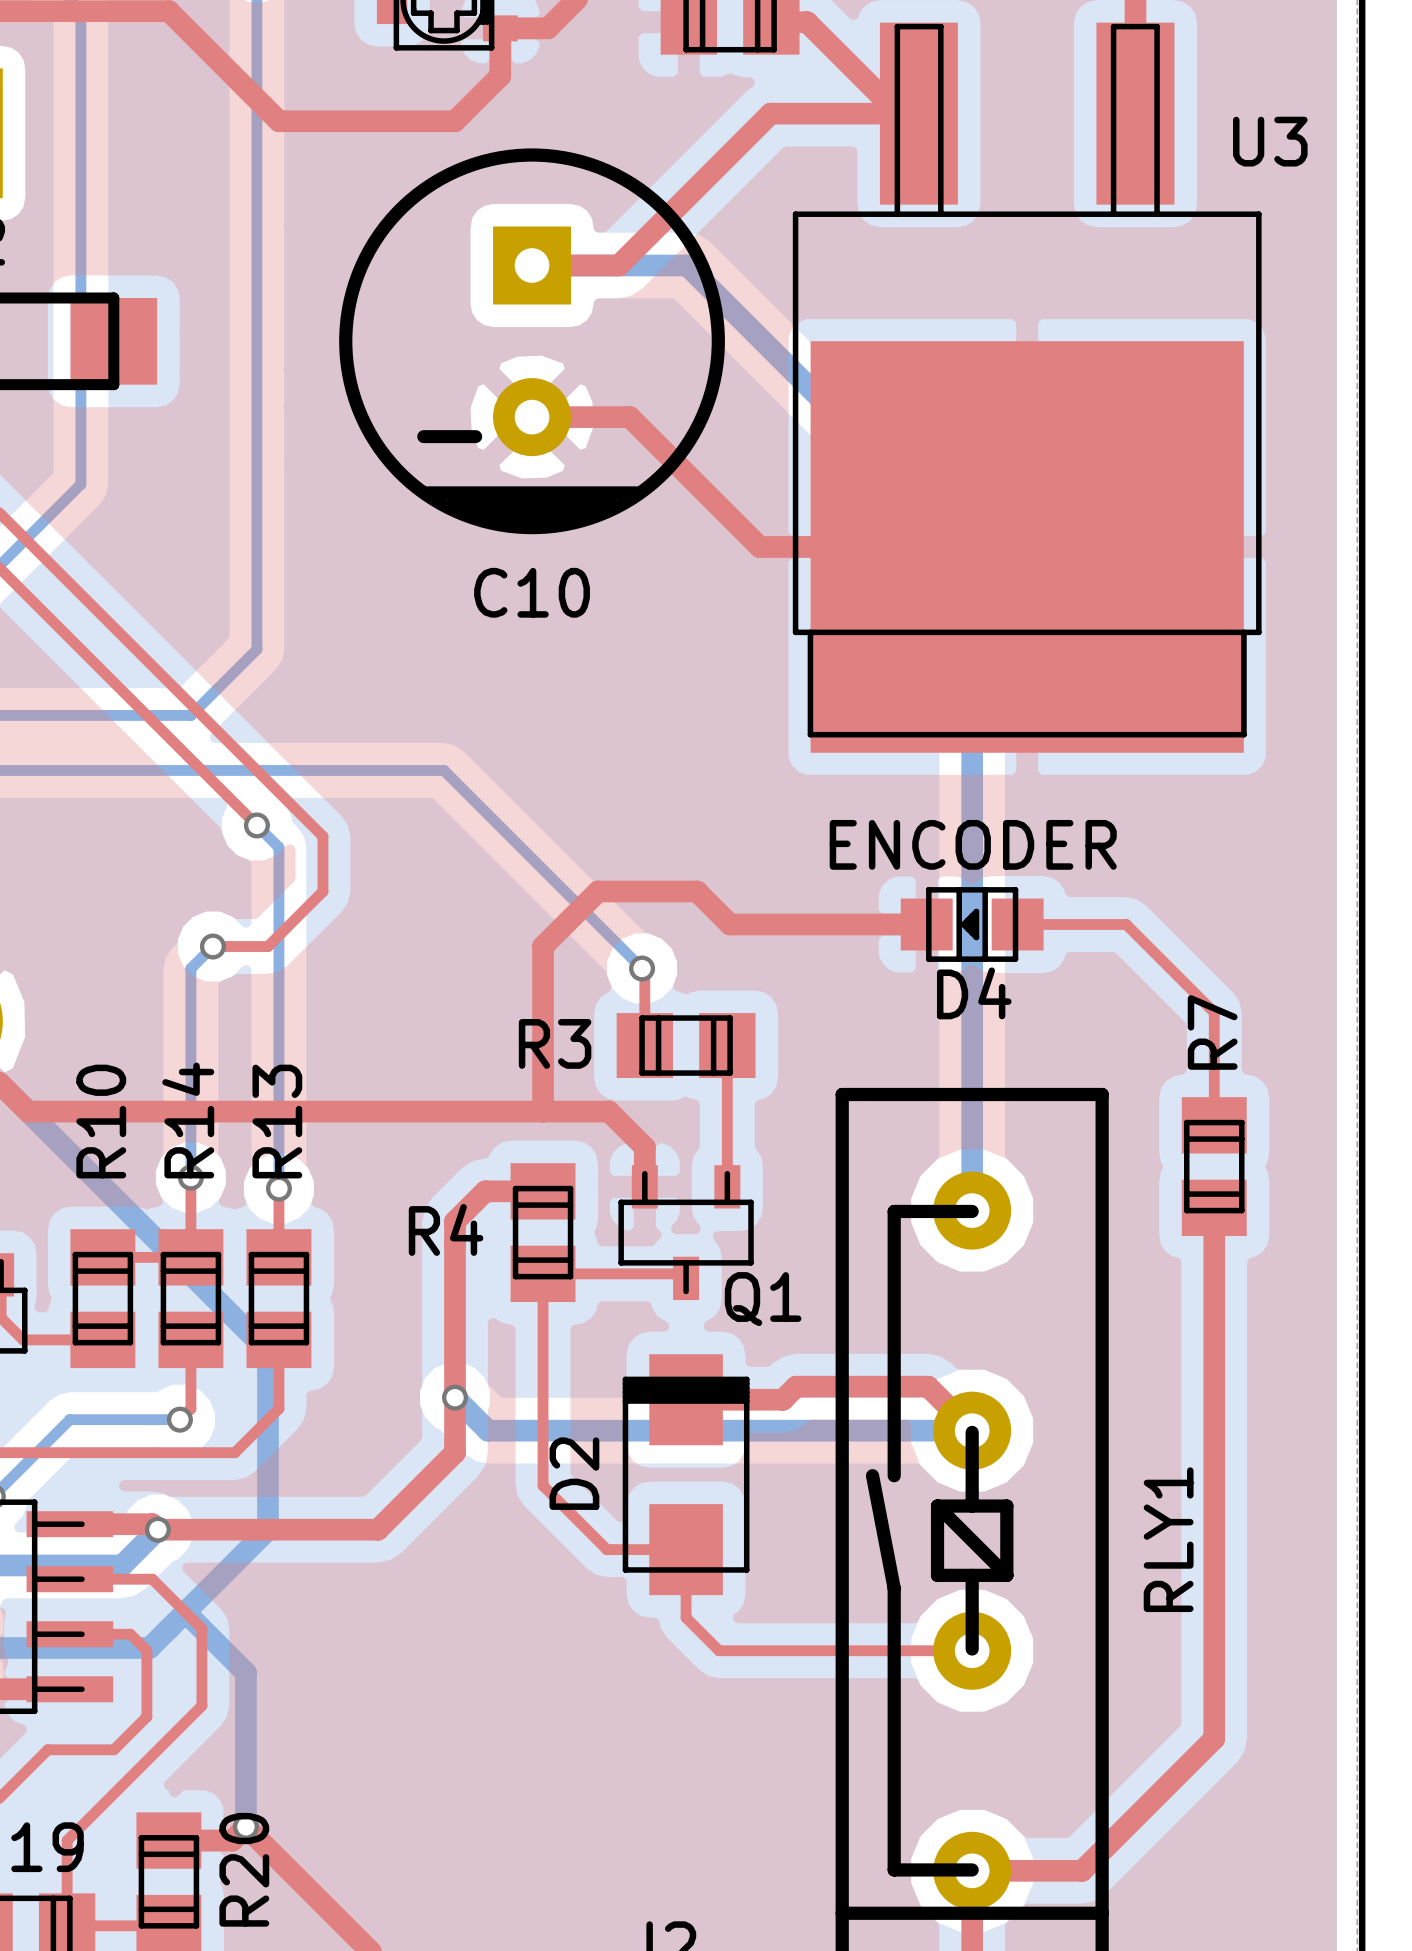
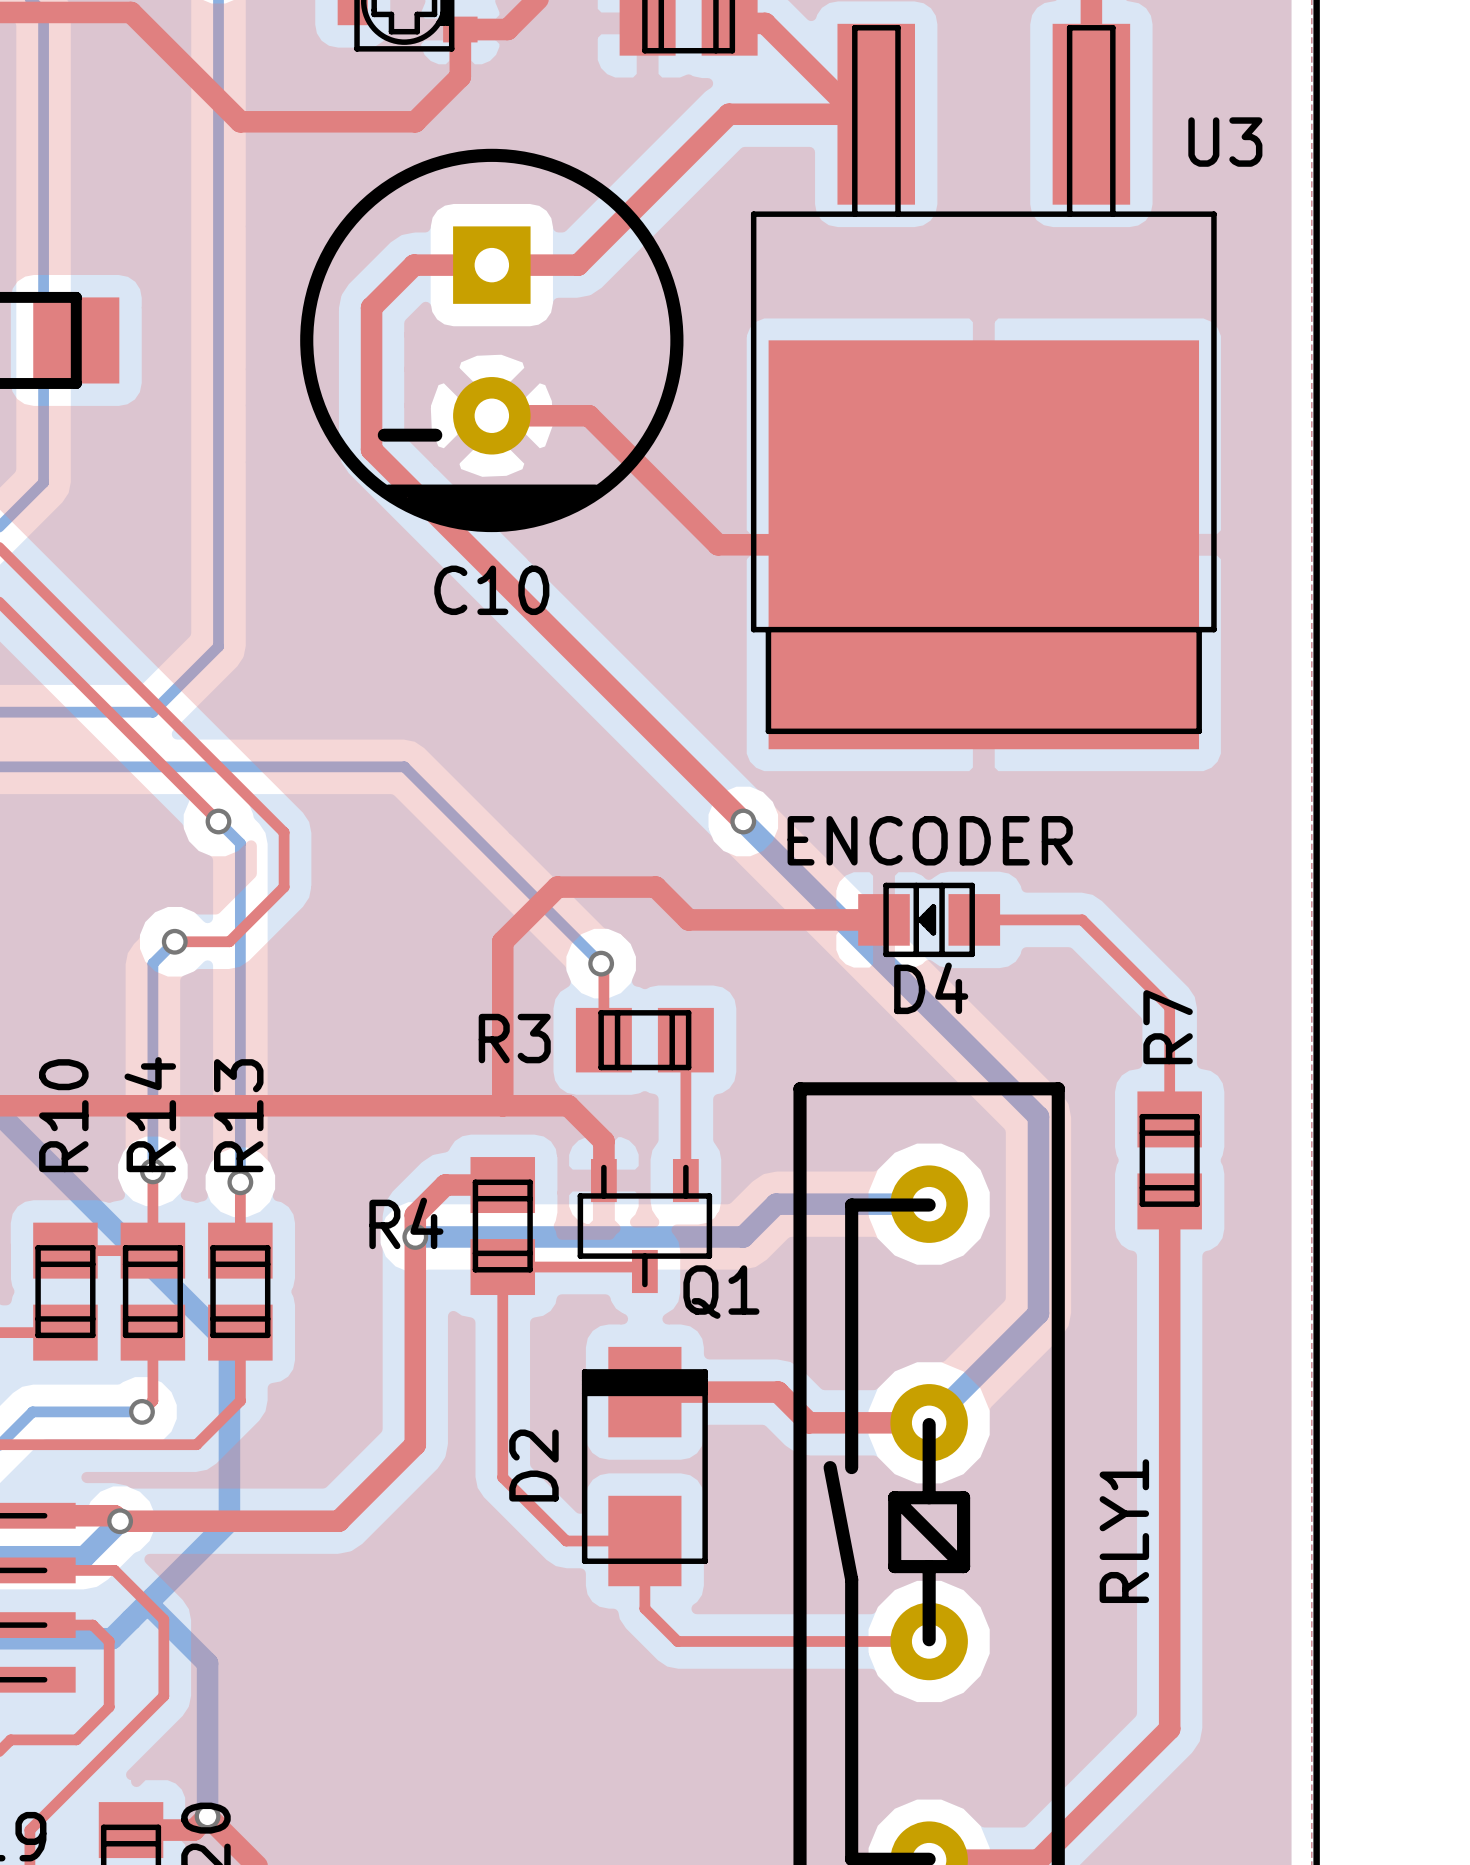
top track: none -> (491, 265) (414, 265) (371, 307) (371, 449) (743, 821)
bottom track: (532, 265) (687, 265) (972, 550) (972, 1210) -> (415, 1236) (743, 1236) (776, 1204) (929, 1204)
bottom track: none -> (743, 821) (1038, 1116) (1038, 1313) (929, 1422) (940, 1422)
via: none -> (743, 821)
bottom track: (455, 1397) (488, 1430) (972, 1430) -> none
via position: (455, 1397) -> (415, 1236)
top track: (783, 1399) (796, 1386) (928, 1386) (972, 1430) -> (741, 1392) (778, 1392) (808, 1422) (929, 1422)

